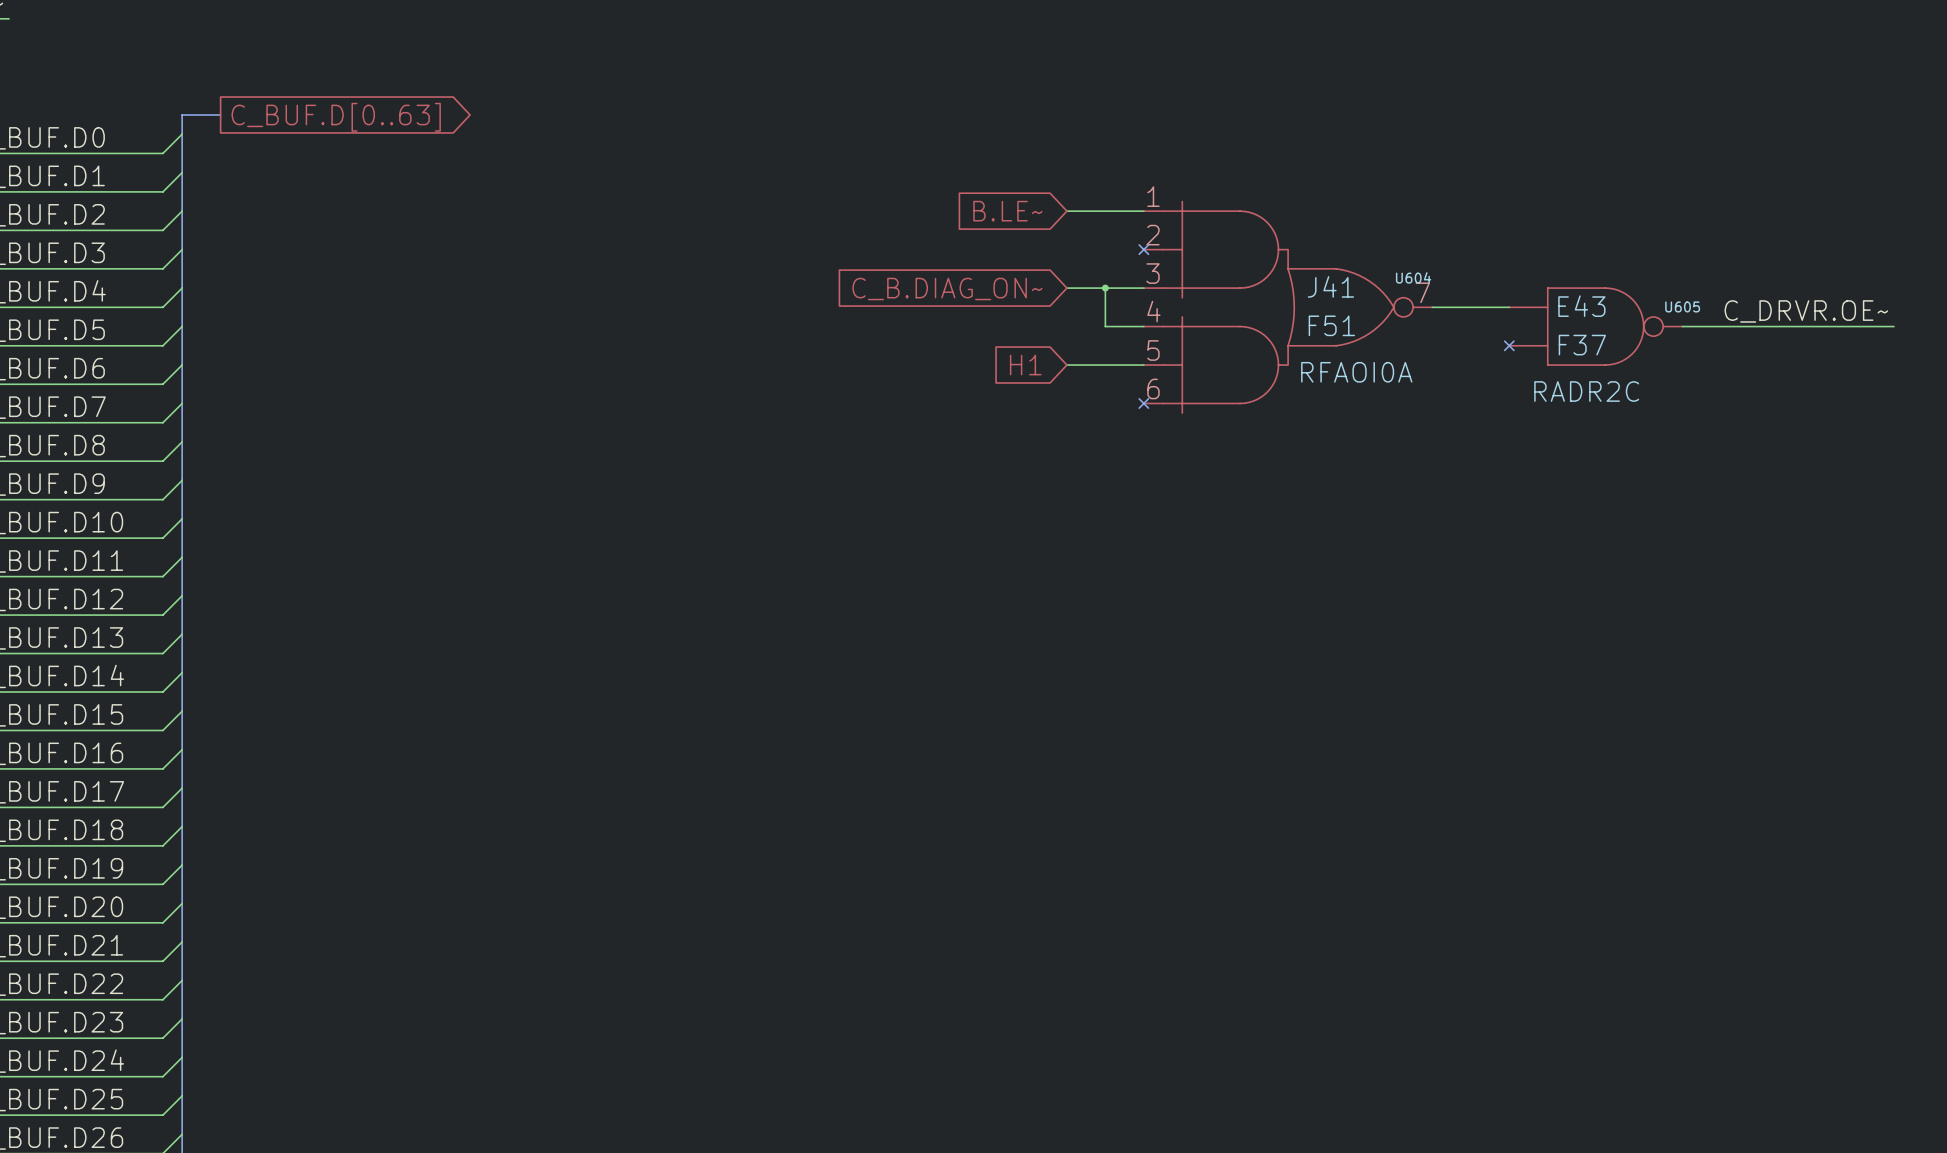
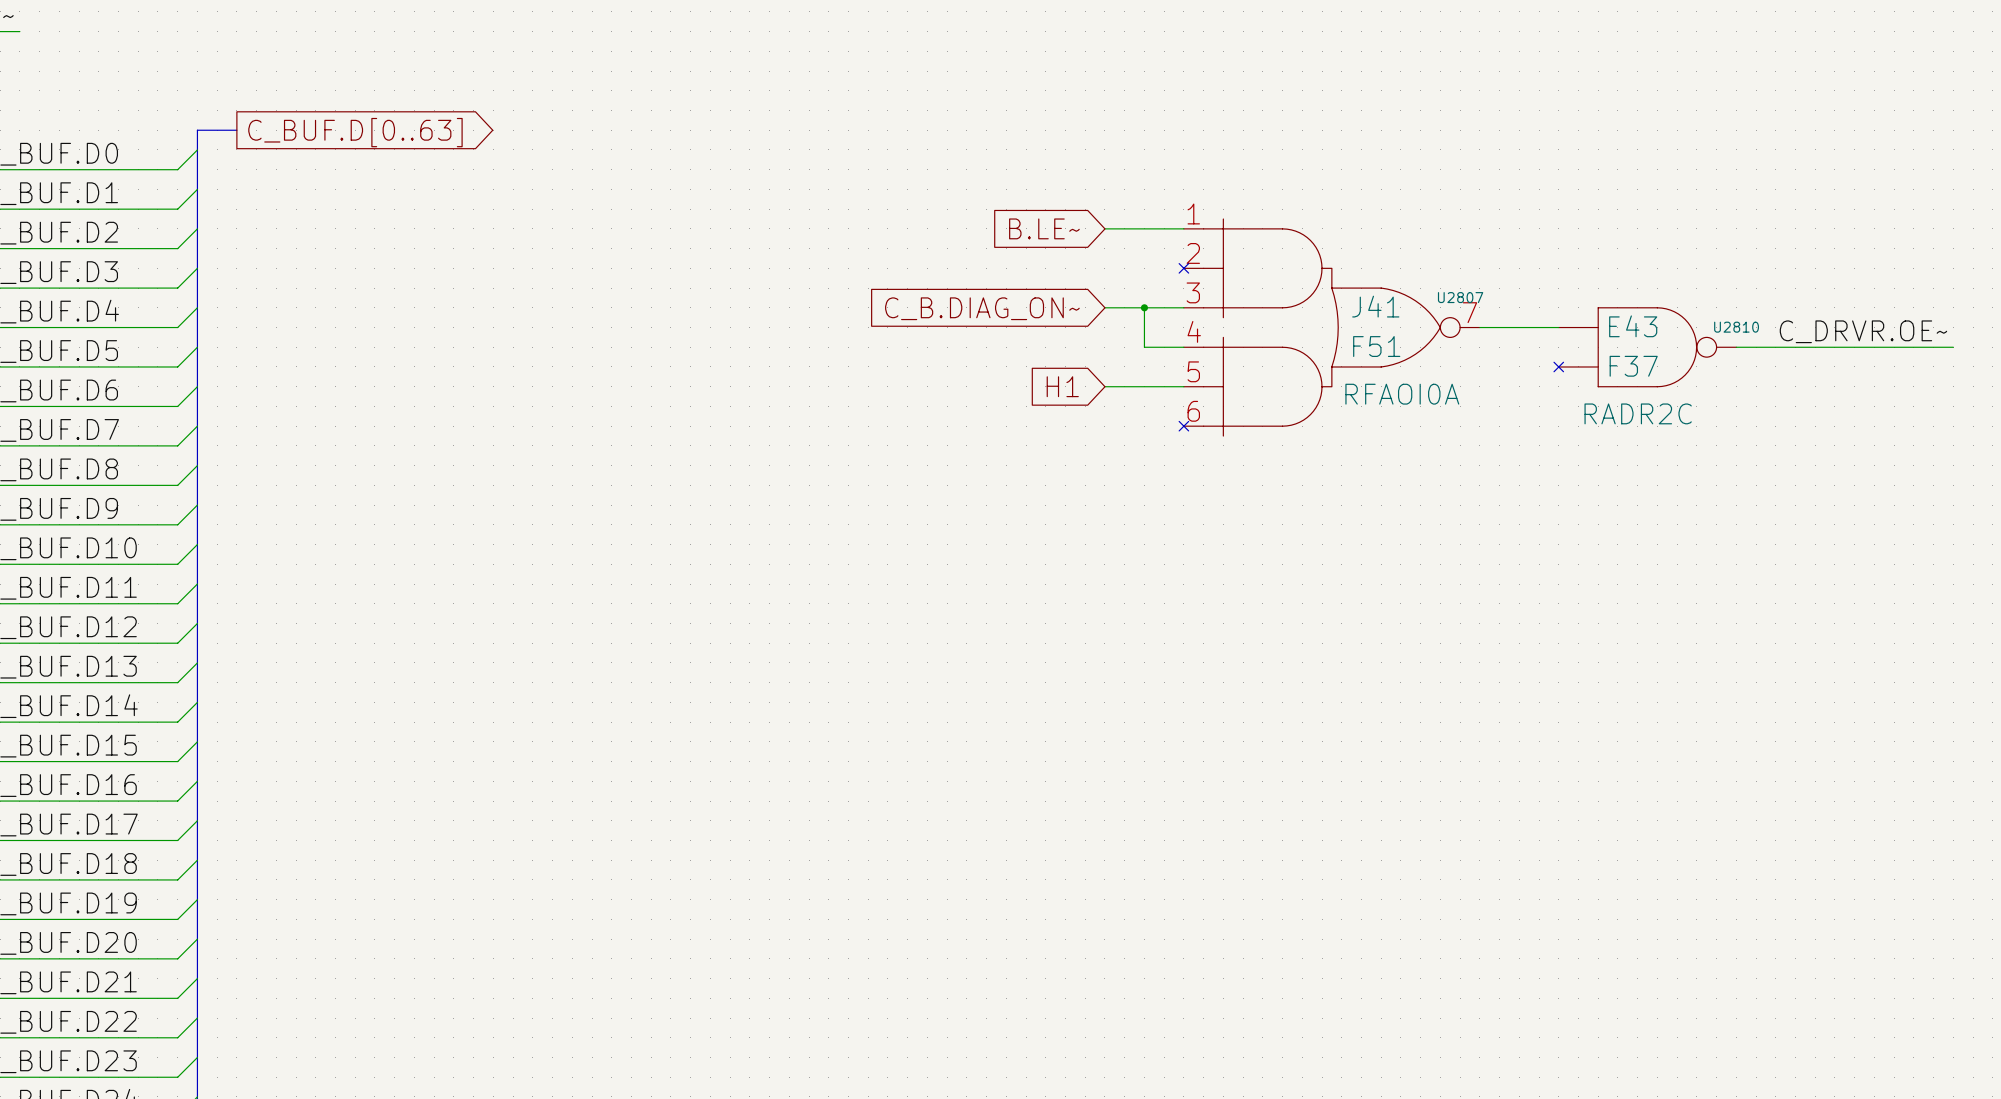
U604 name: U604 (1413, 277) -> U2807 (1460, 297)
U605 name: U605 (1682, 306) -> U2810 (1736, 327)

